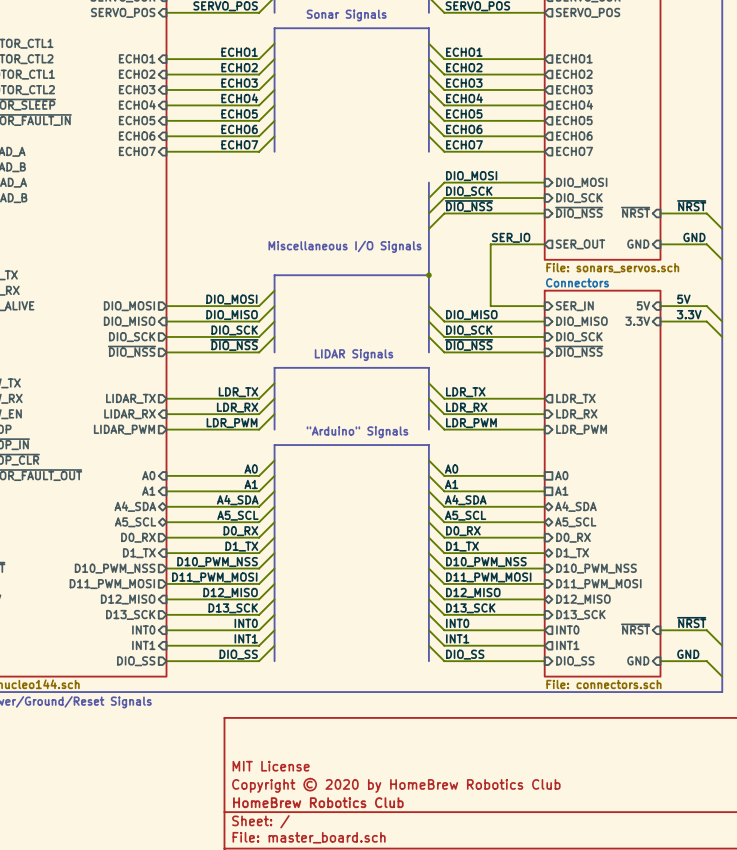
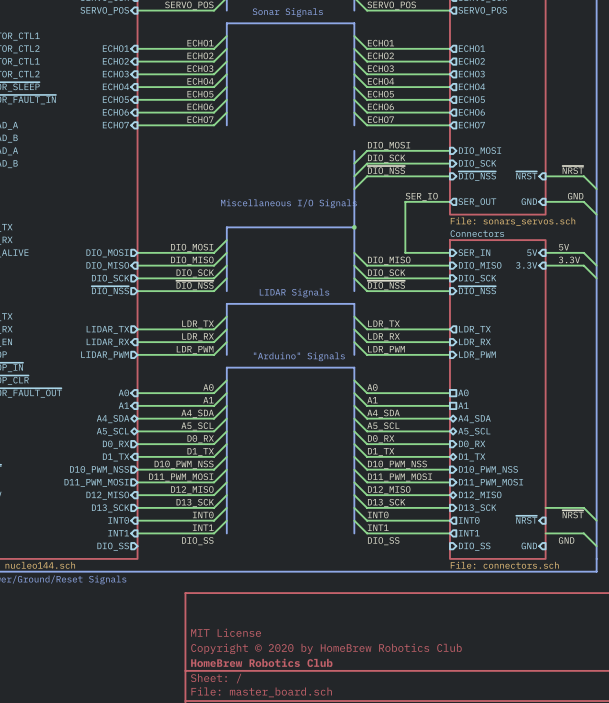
wire: (660, 630) (706, 630) (722, 645) -> (545, 507) (583, 507) (596, 520)
bus: (274, 645) (274, 661) -> none
wire: (274, 645) (259, 661) (166, 661) -> none
bus: (428, 645) (428, 661) -> none
wire: (428, 645) (444, 661) (544, 661) -> none
wire: (660, 661) (706, 661) (722, 676) -> (545, 533) (583, 533) (596, 546)

